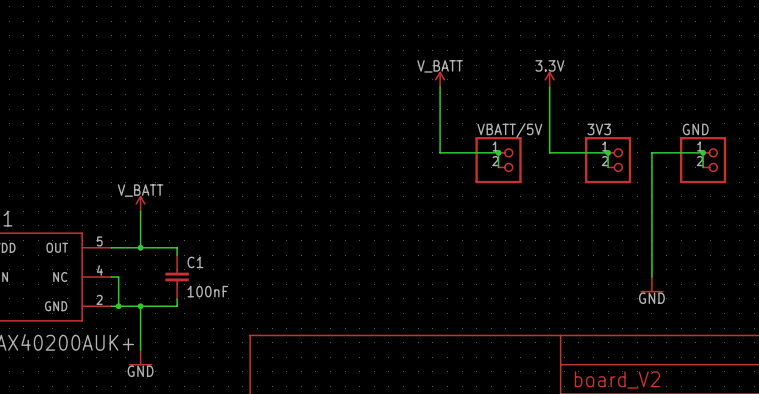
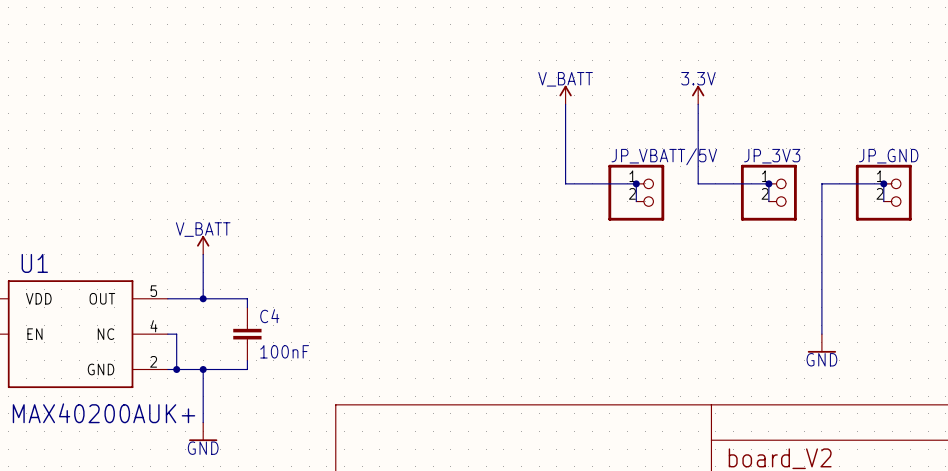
3V3 name: 3V3 (599, 129) -> JP_3V3 (772, 156)
GND name: GND (695, 129) -> JP_GND (888, 156)
VBATT/5V name: VBATT/5V (509, 130) -> JP_VBATT/5V (664, 156)
C1 name: C1 (195, 262) -> C4 (269, 316)

